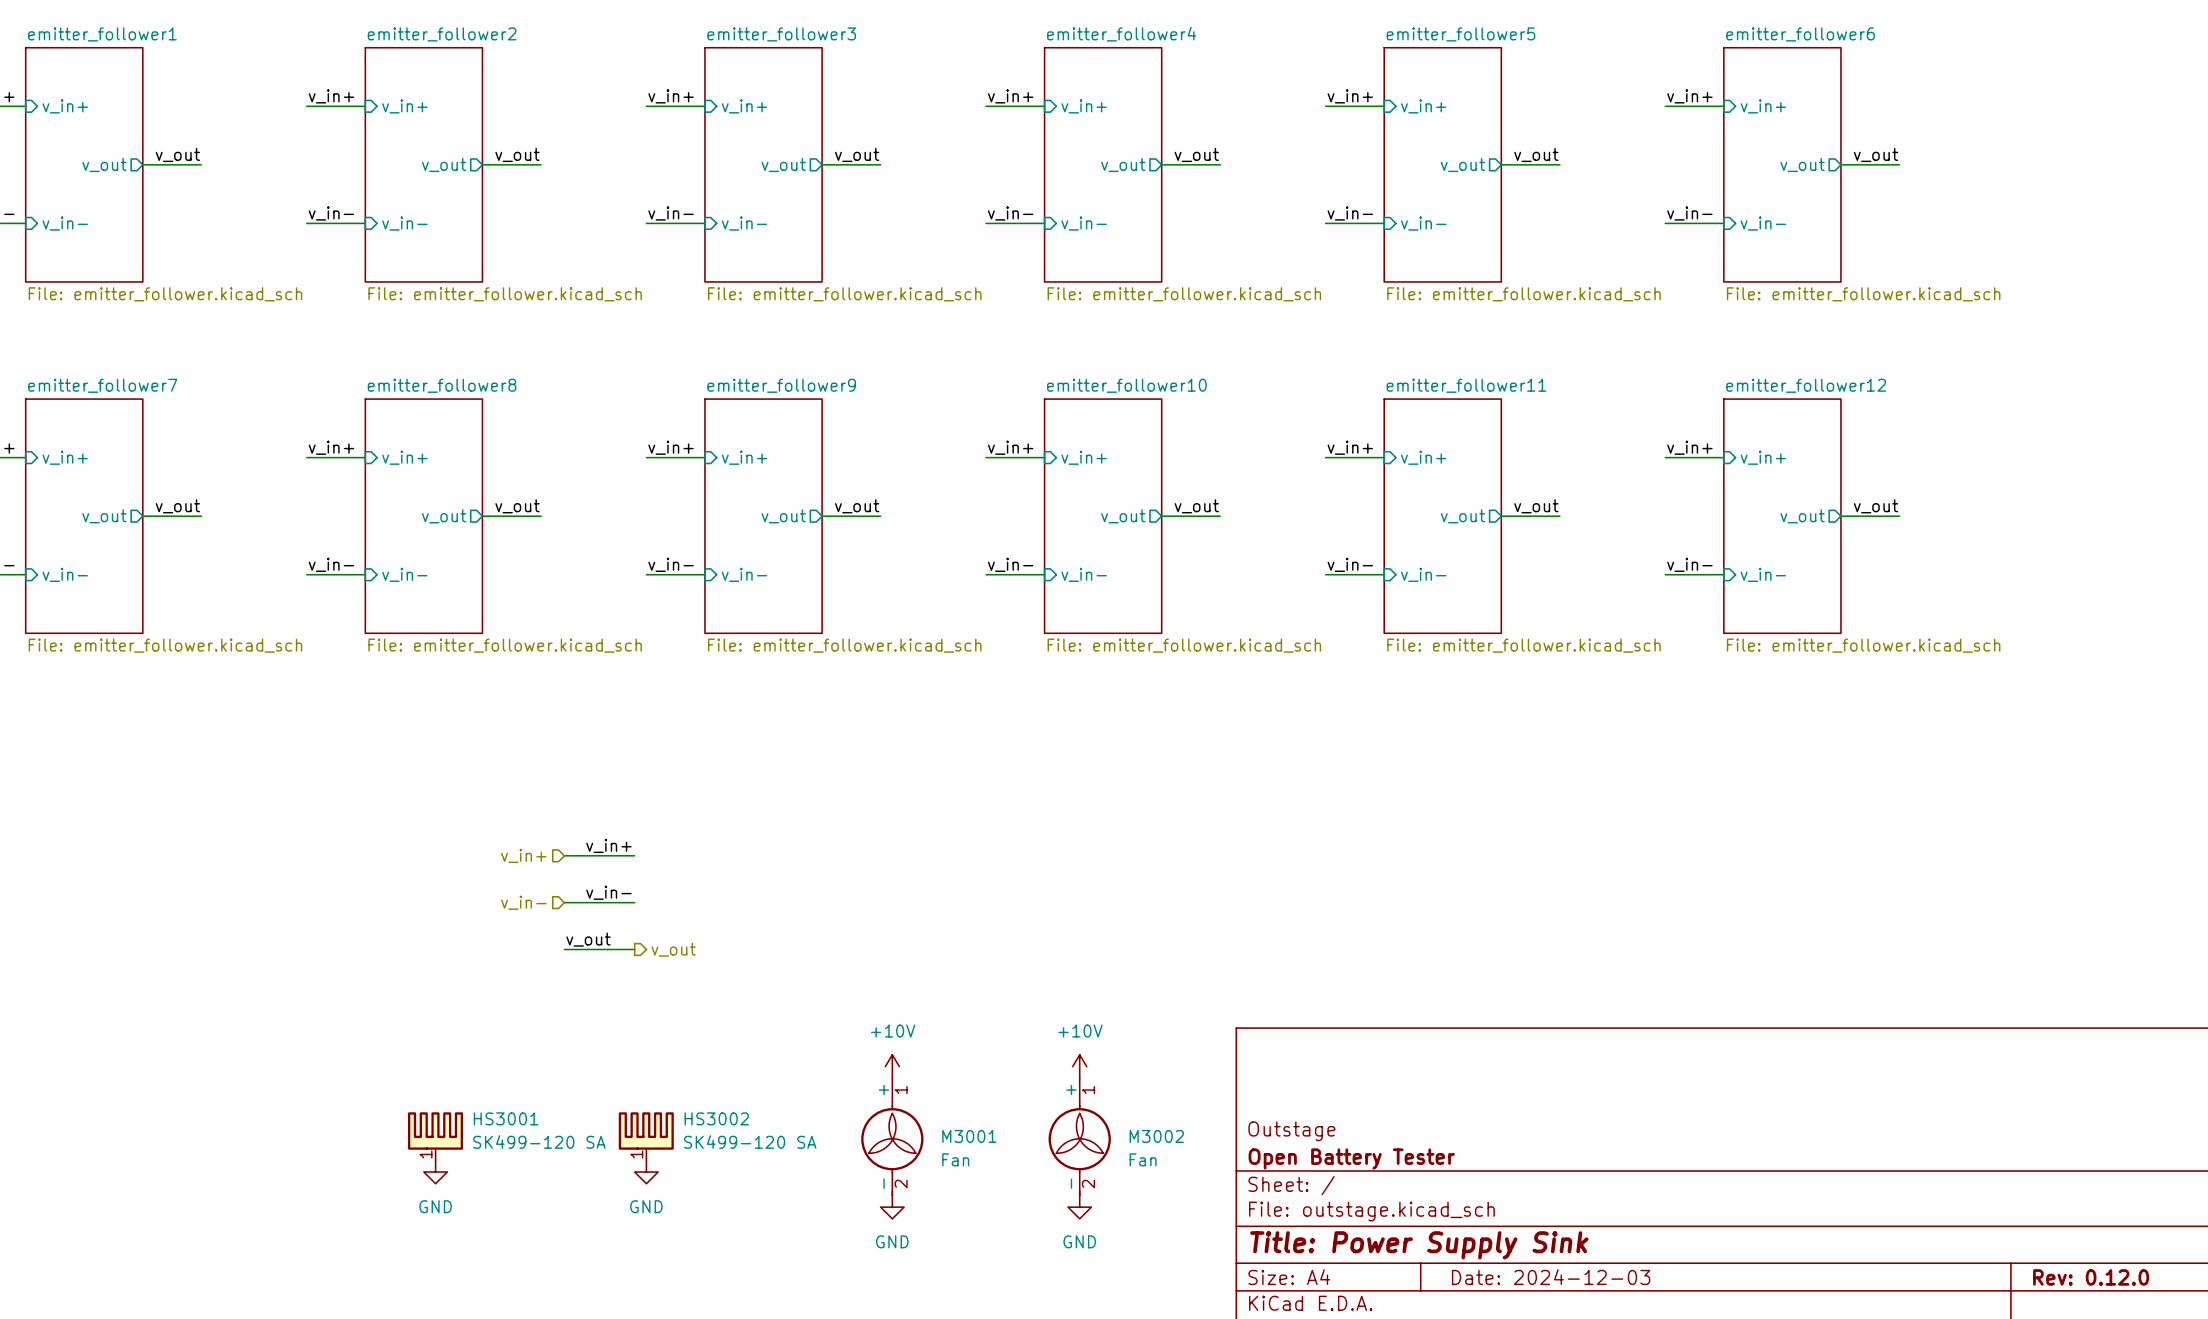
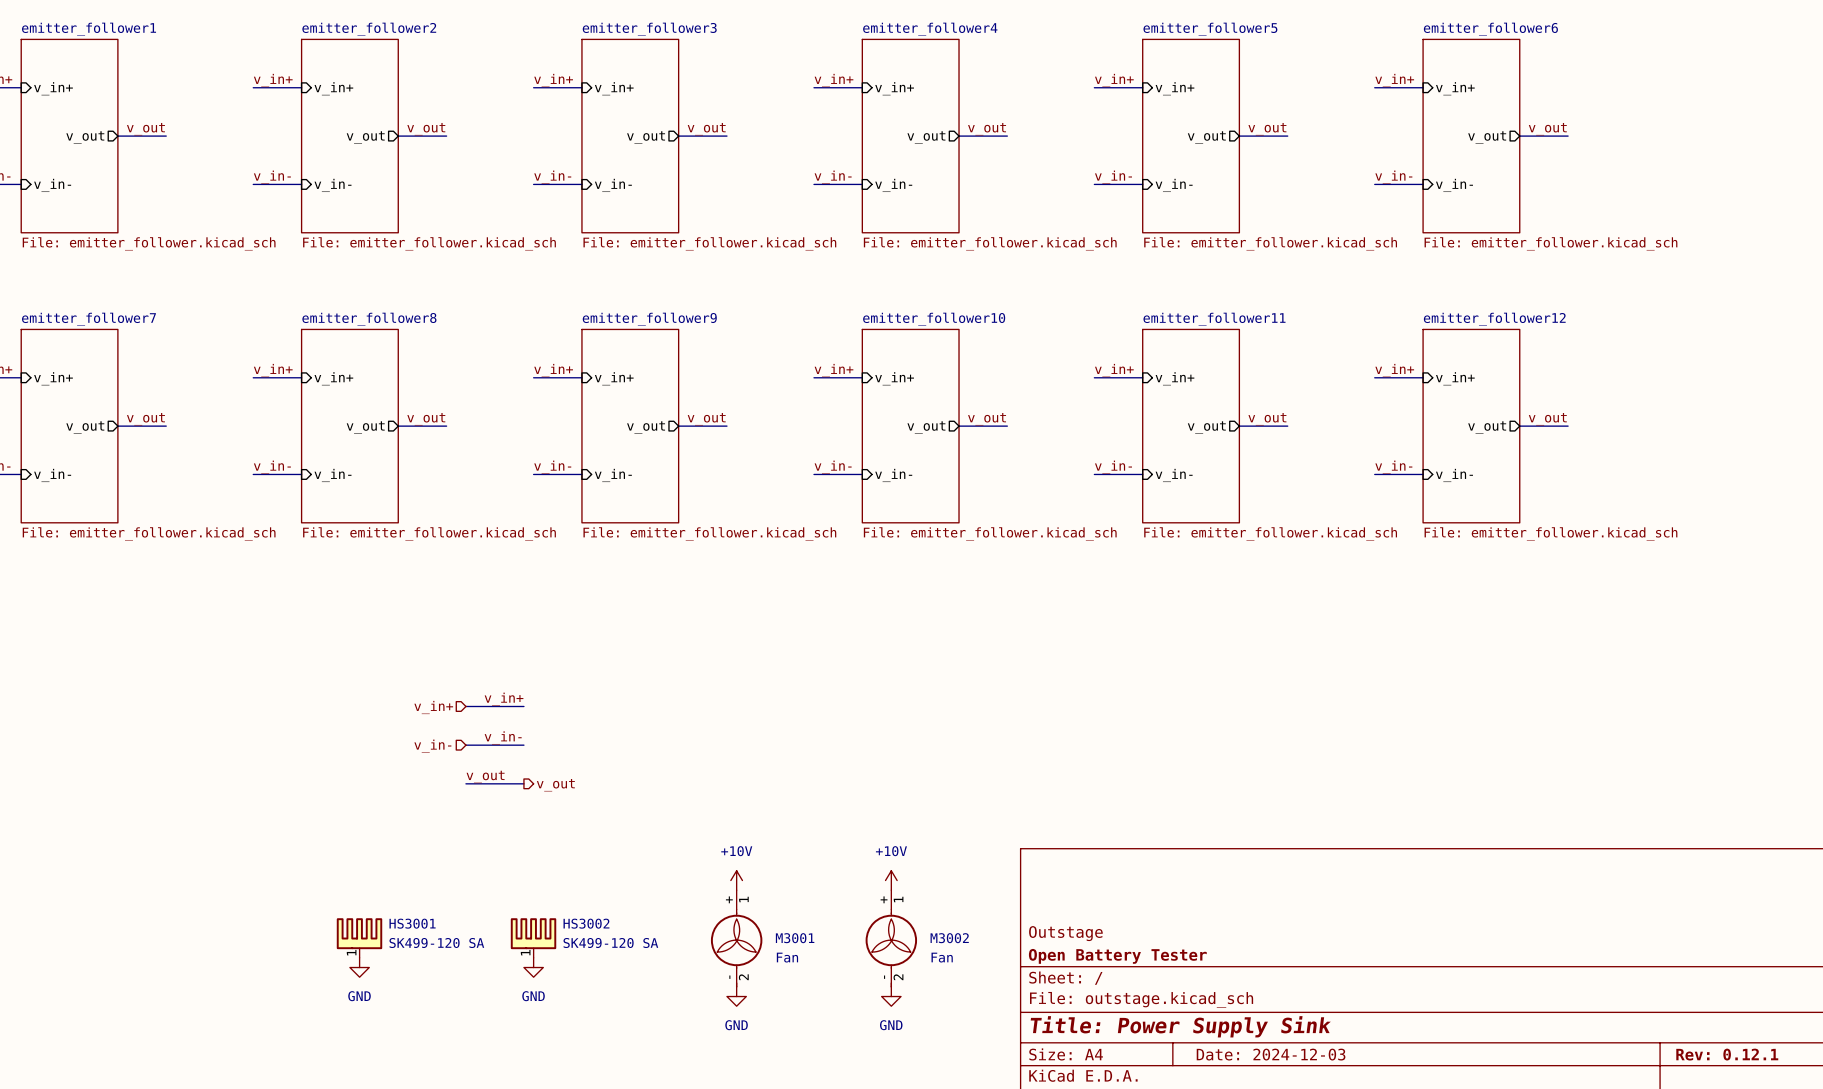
title block: Rev: 0.12.0 (2091, 1277) -> Rev: 0.12.1 (1727, 1054)

